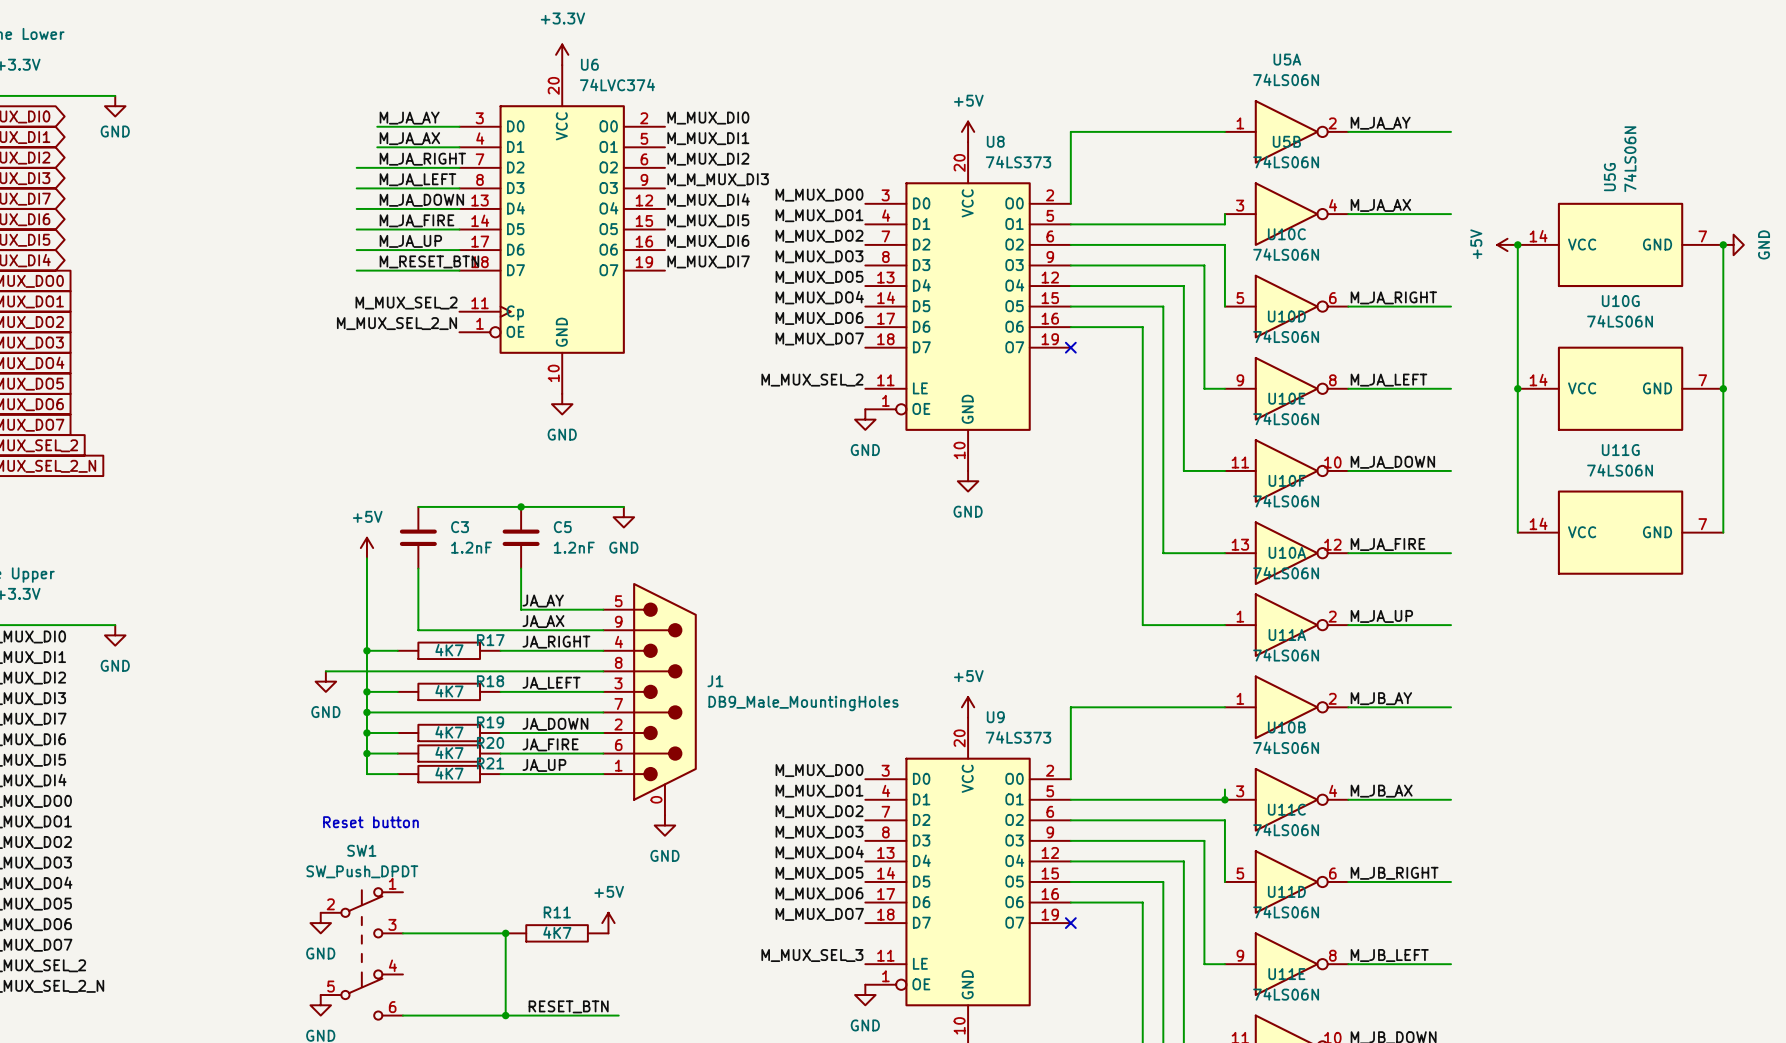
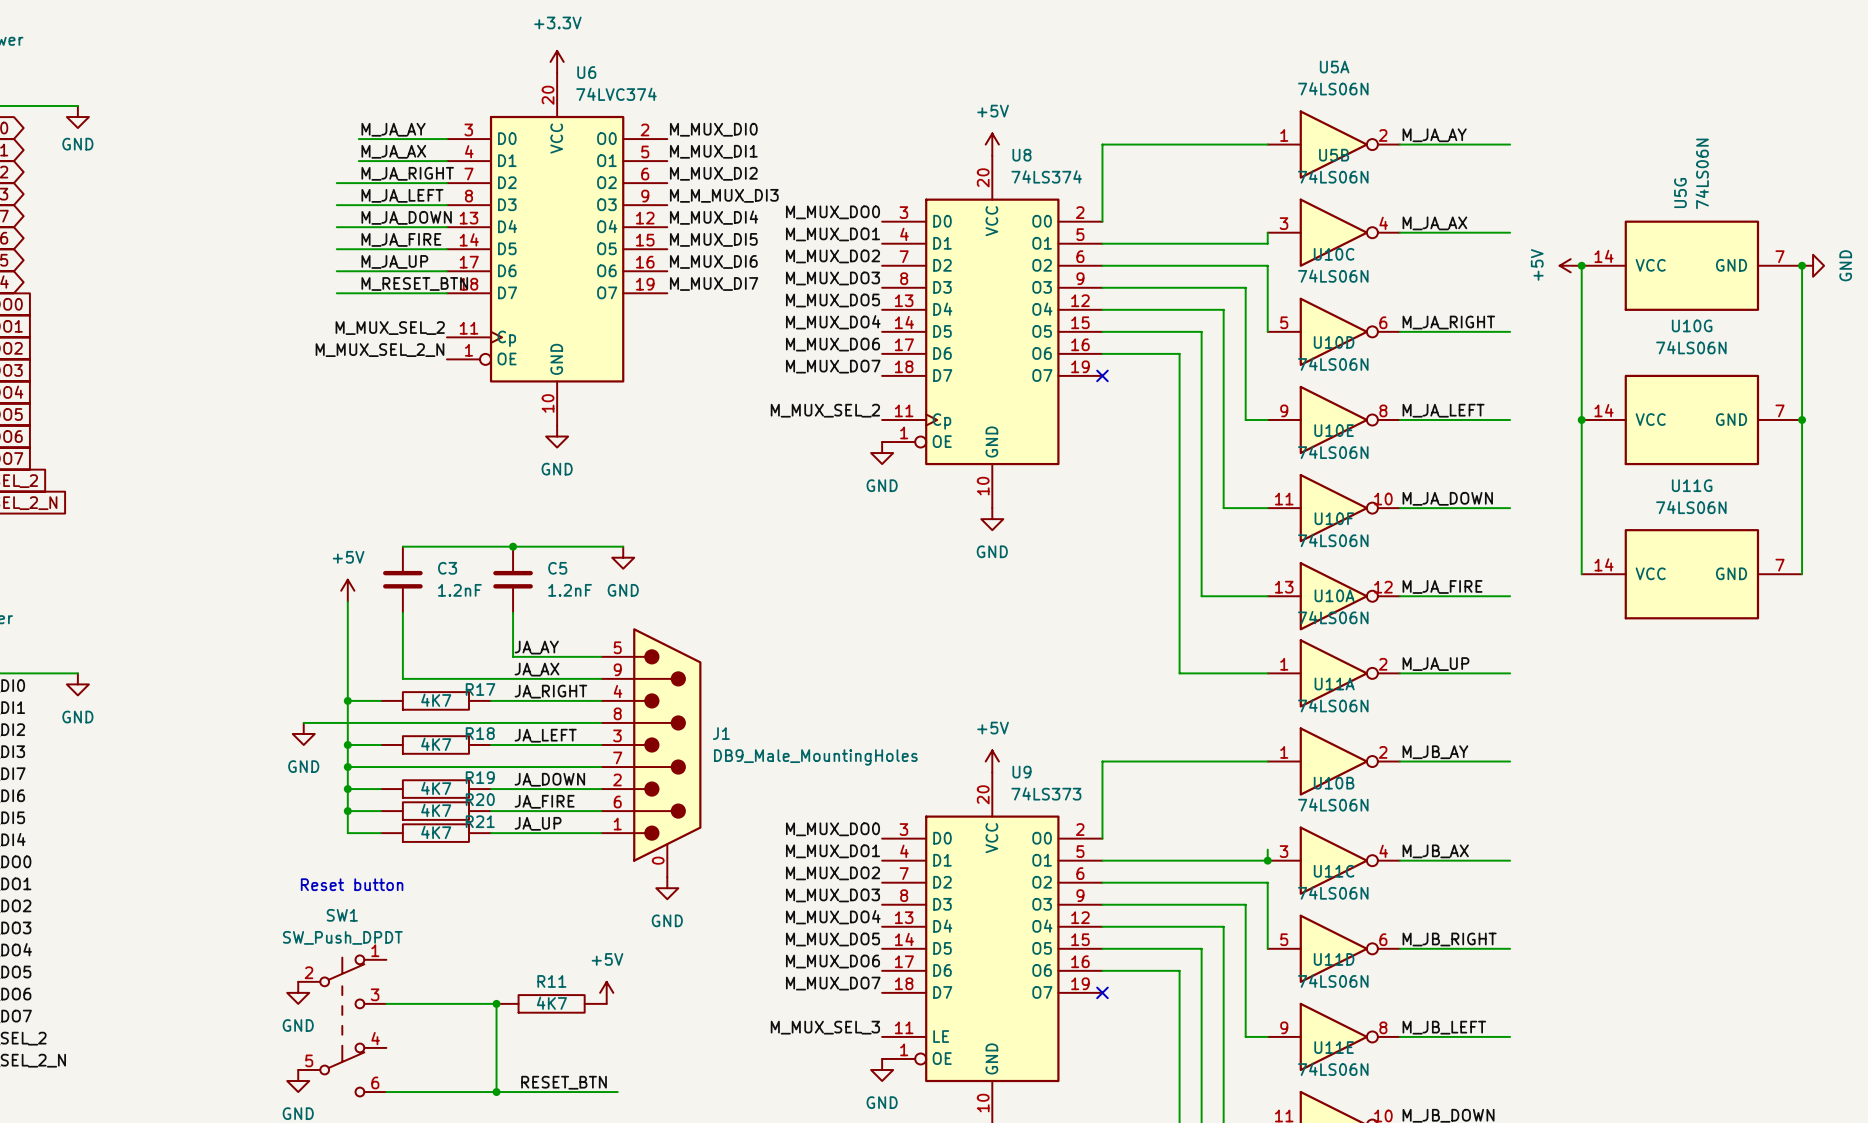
U8 symbol: [865, 142, 1071, 471] -> [882, 155, 1103, 509]
U8 value: 74LS373 (1018, 162) -> 74LS374 (1046, 176)

